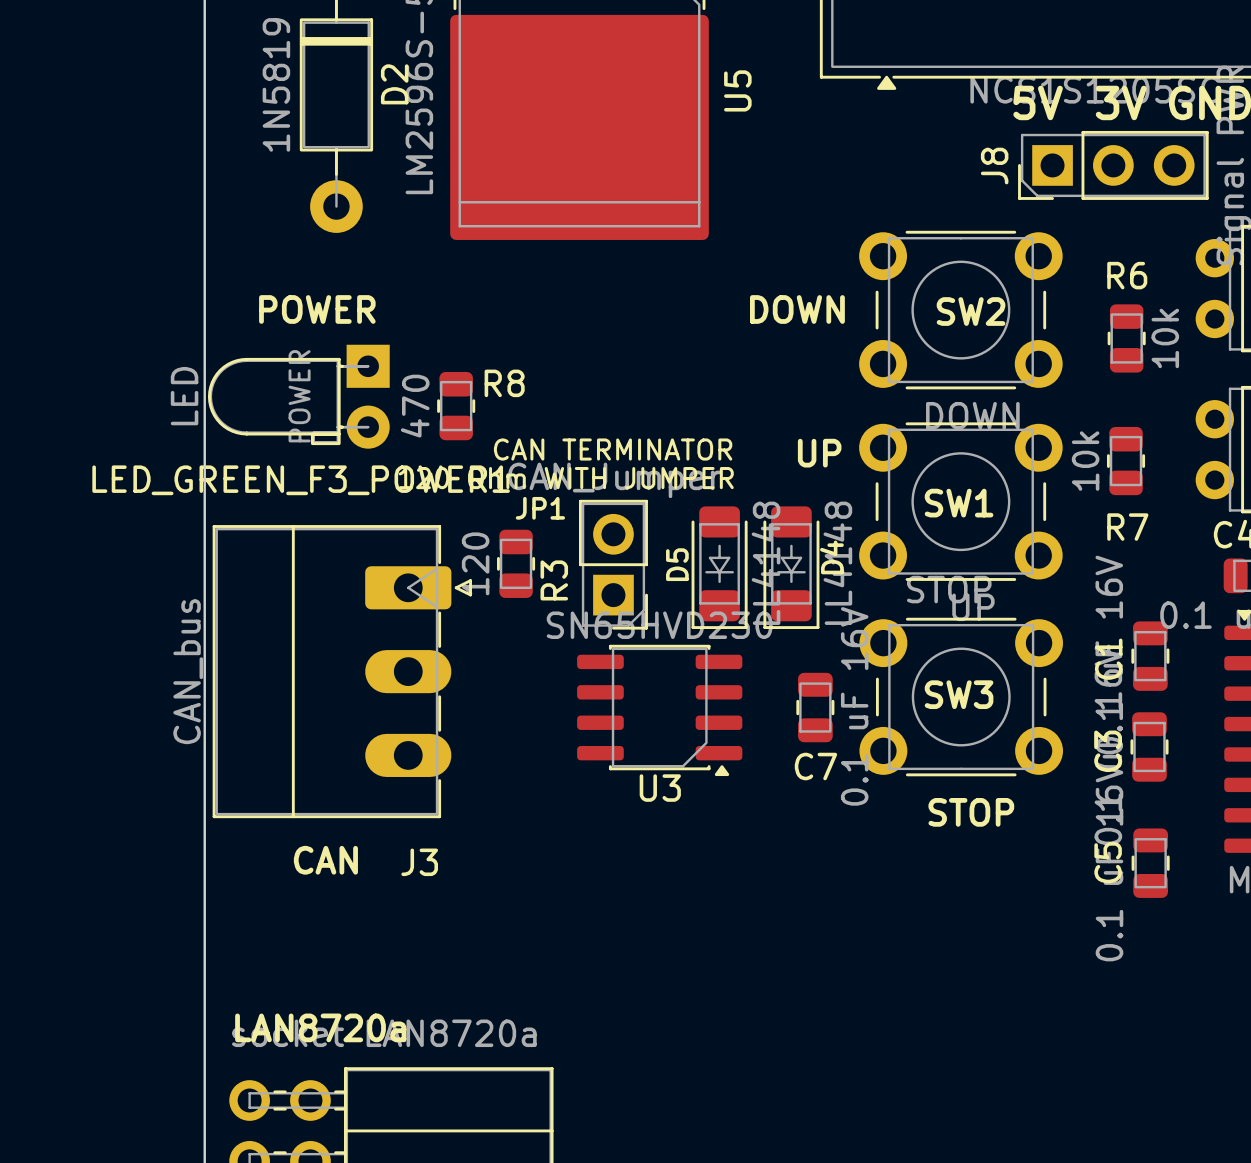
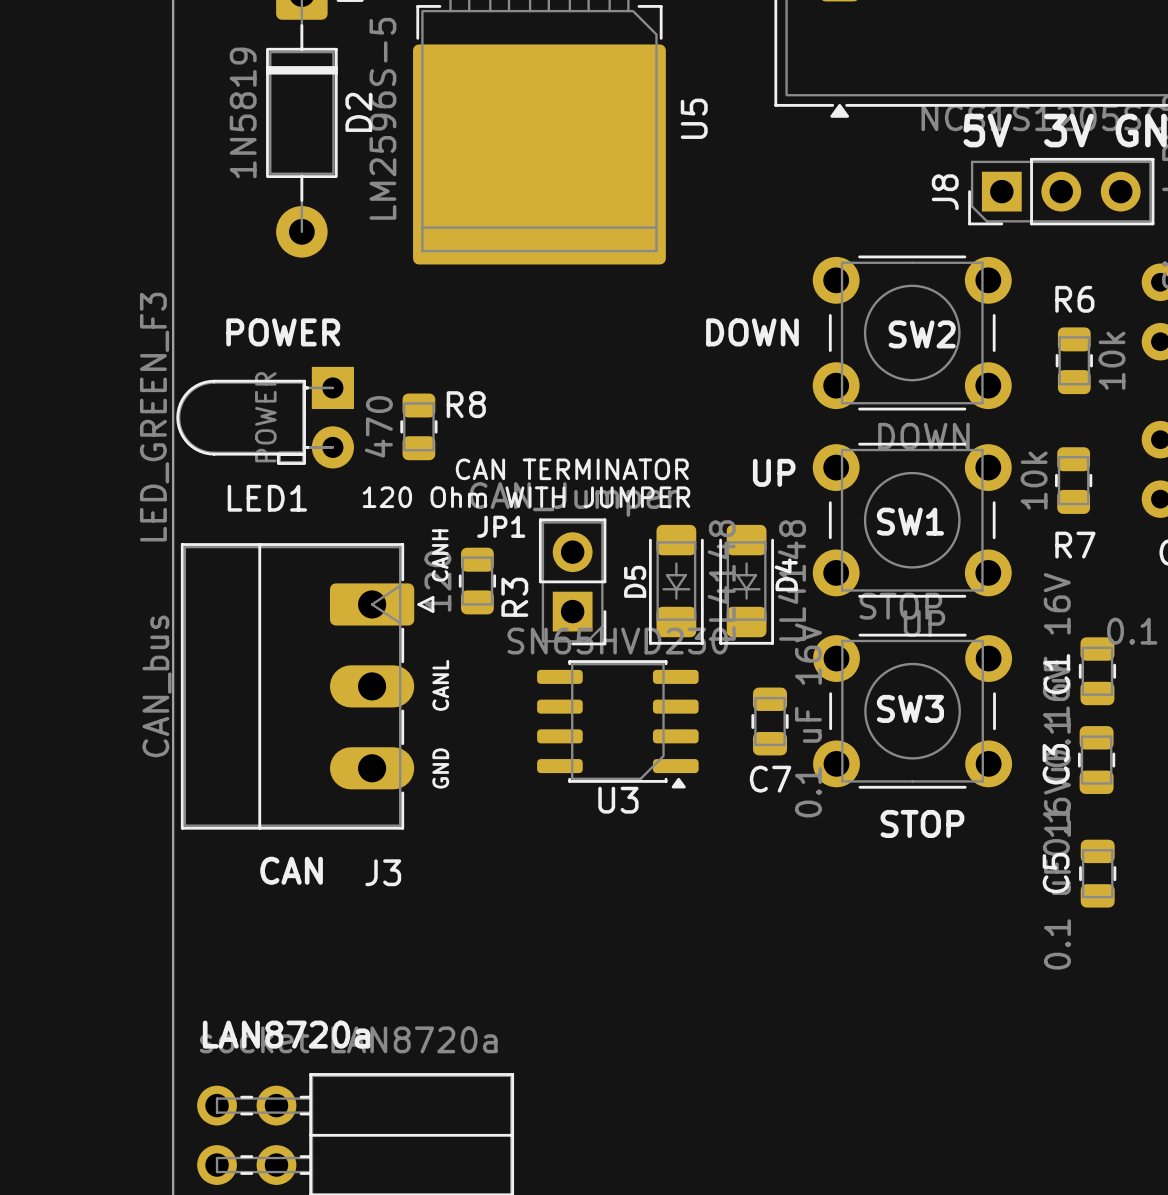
LED_GREEN_F3_POWER1 value: LED (184, 396) -> LED_GREEN_F3 (154, 417)
LED_GREEN_F3_POWER1 name: LED_GREEN_F3_POWER1 (301, 480) -> LED1 (267, 498)
text: none -> CANH (440, 555)
text: none -> CANL (440, 685)
text: none -> GND (440, 768)

